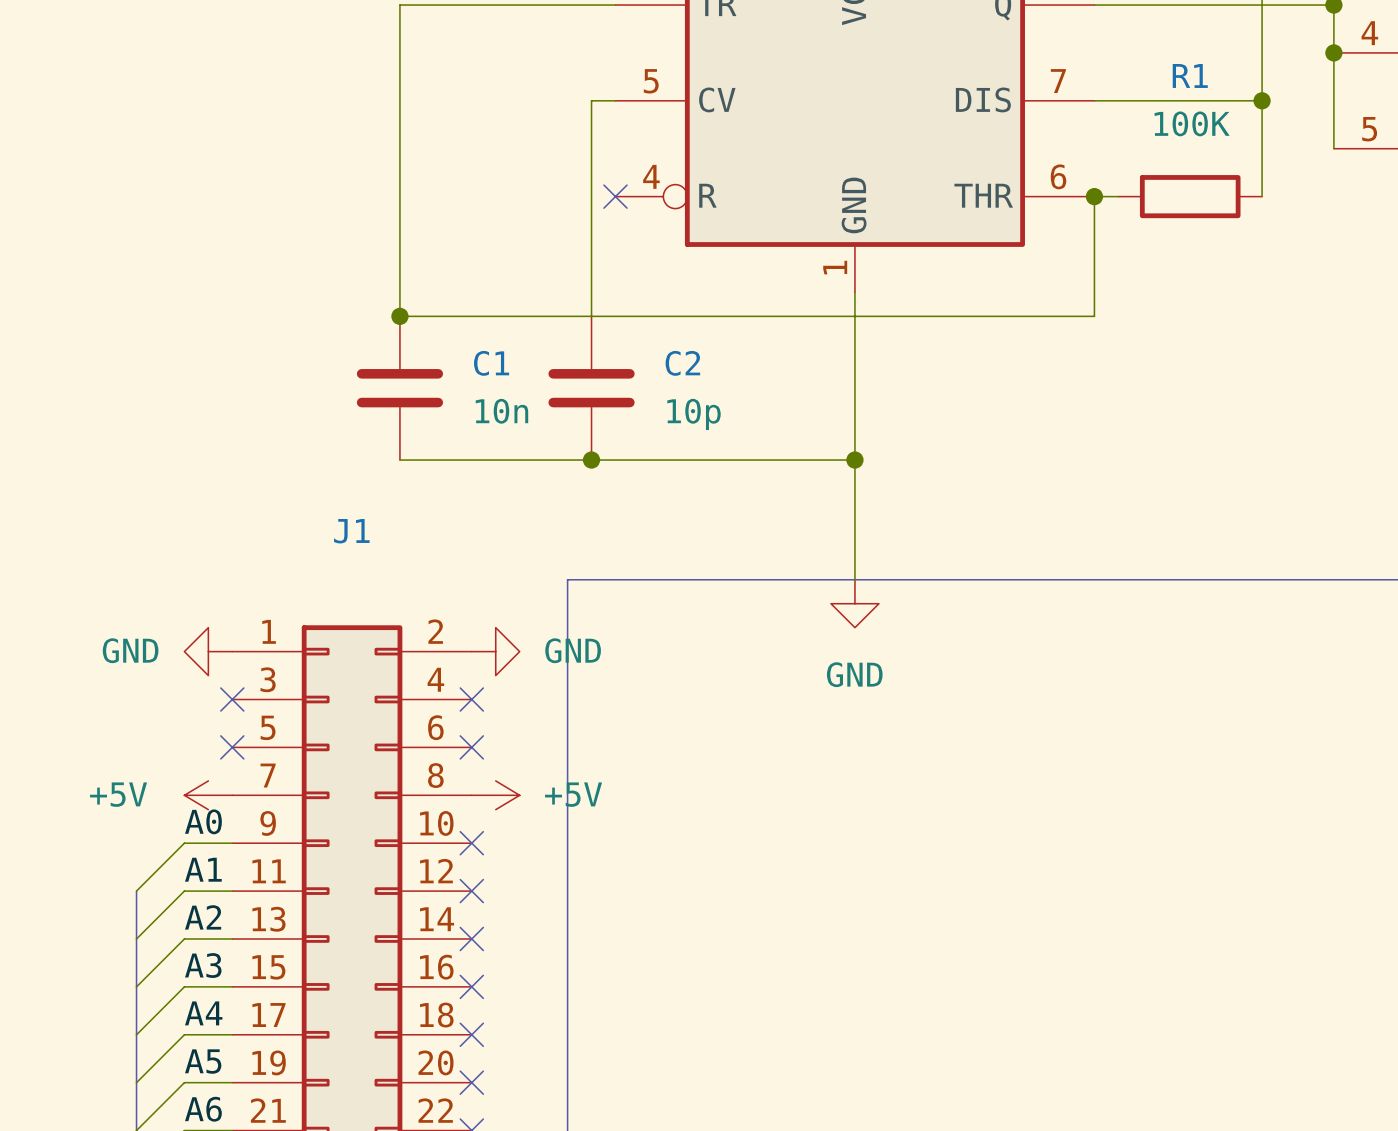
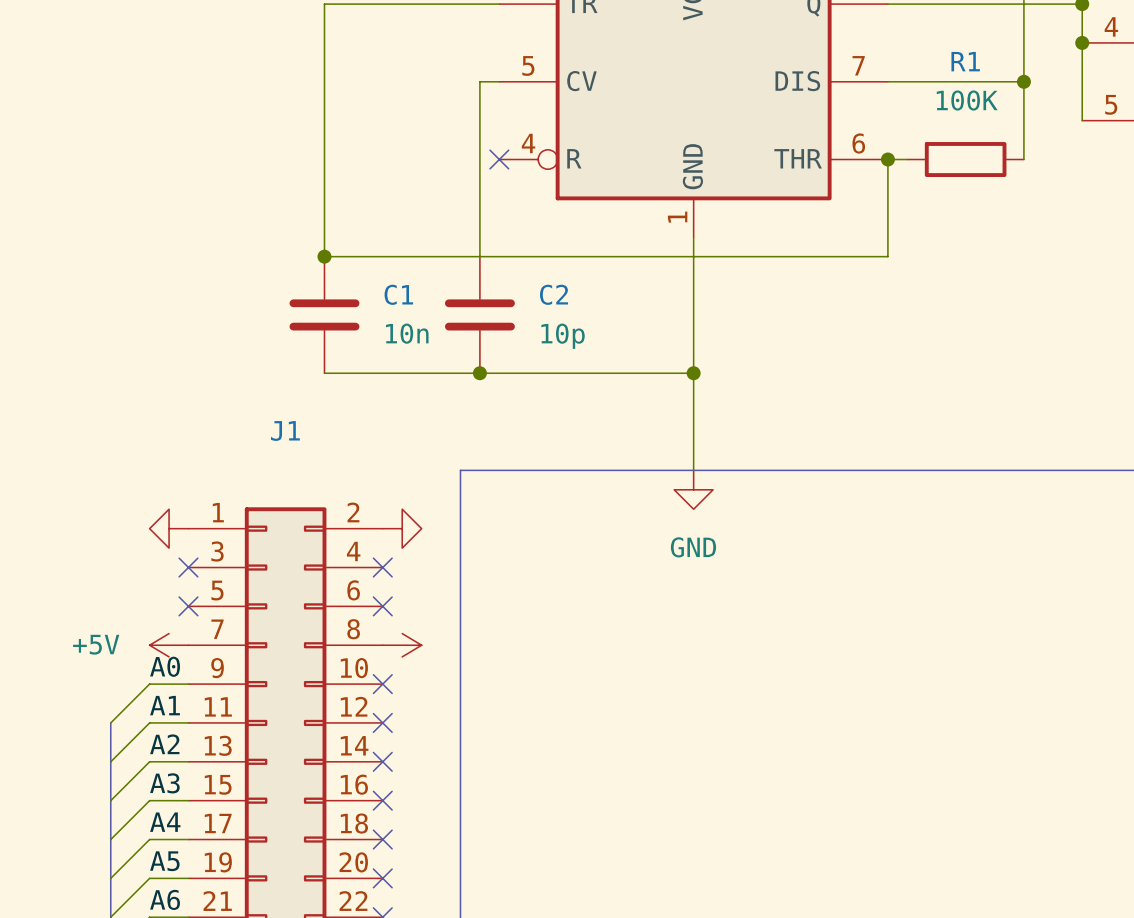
power symbol text: GND (130, 650) -> none
power symbol text: GND (573, 650) -> none
power symbol text: +5V (573, 794) -> none

